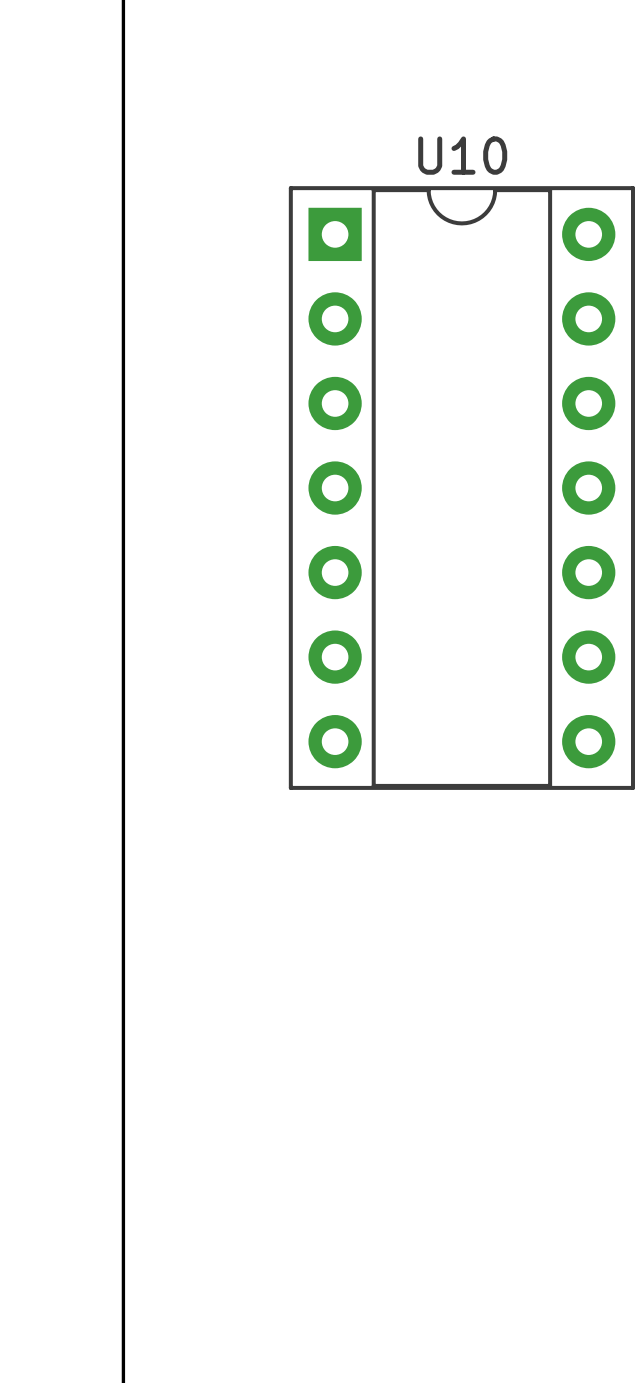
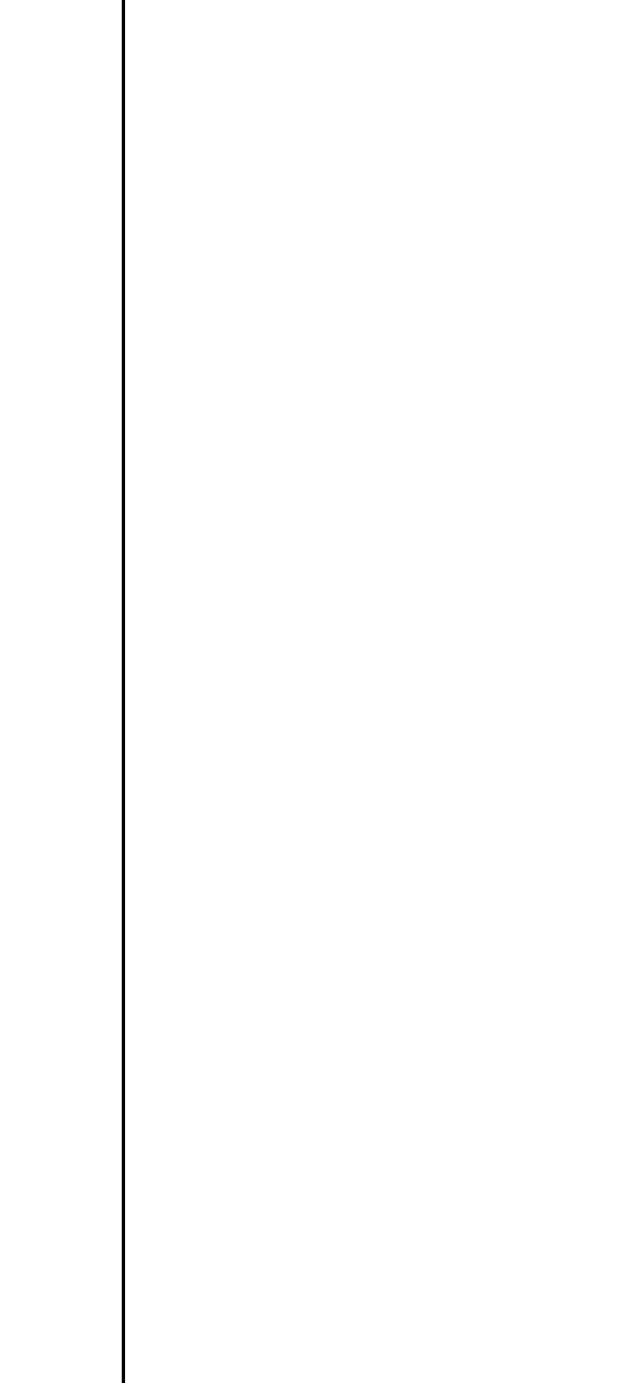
U10: (461, 488) -> none

